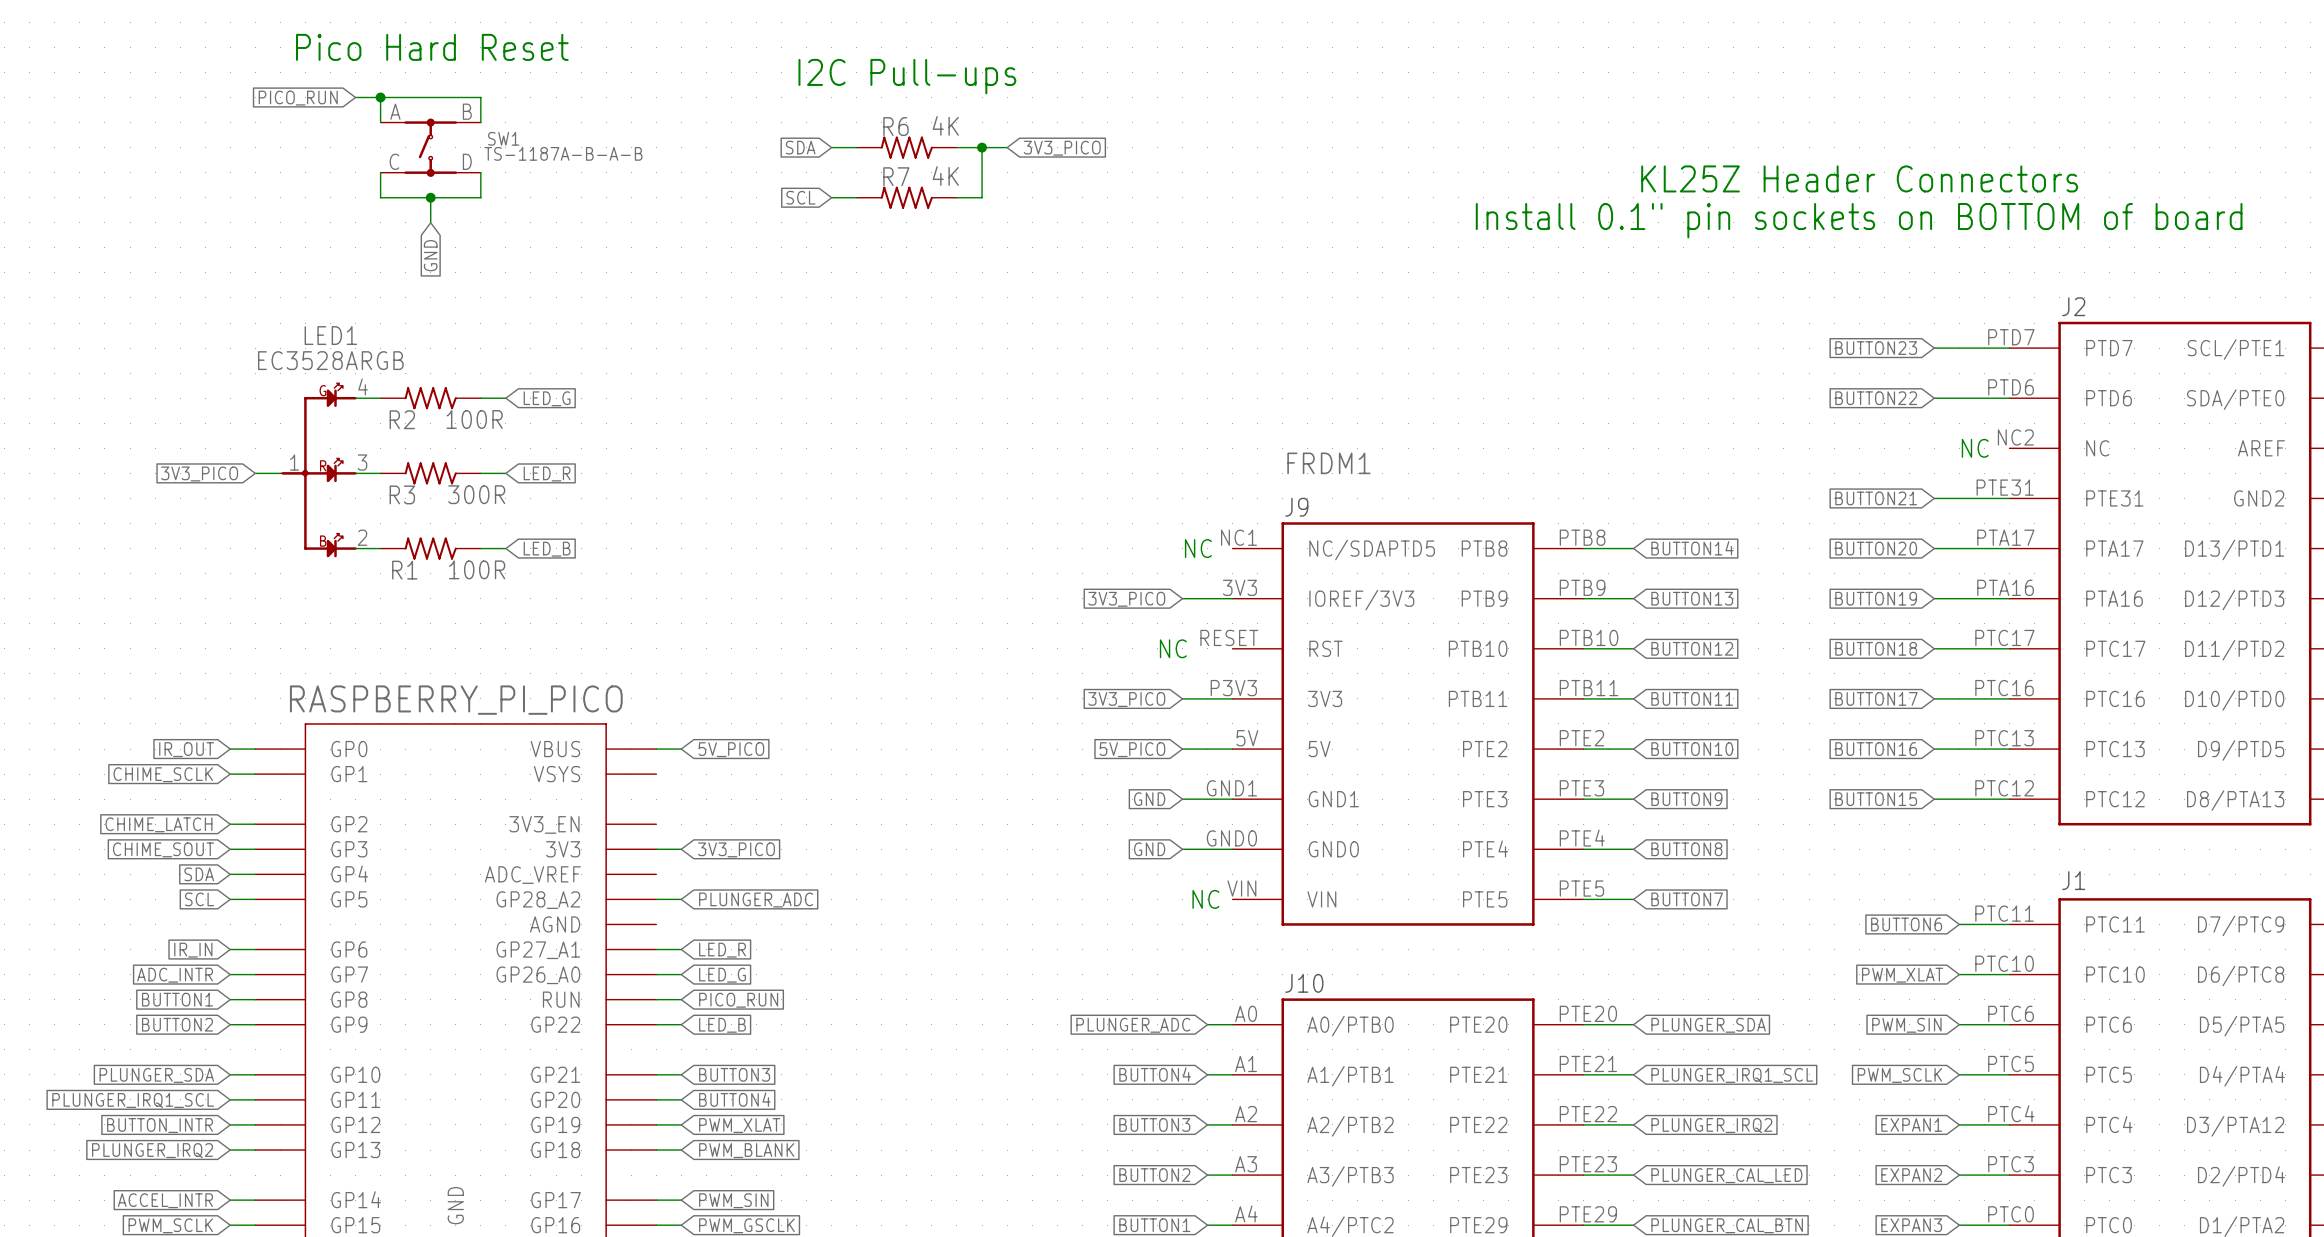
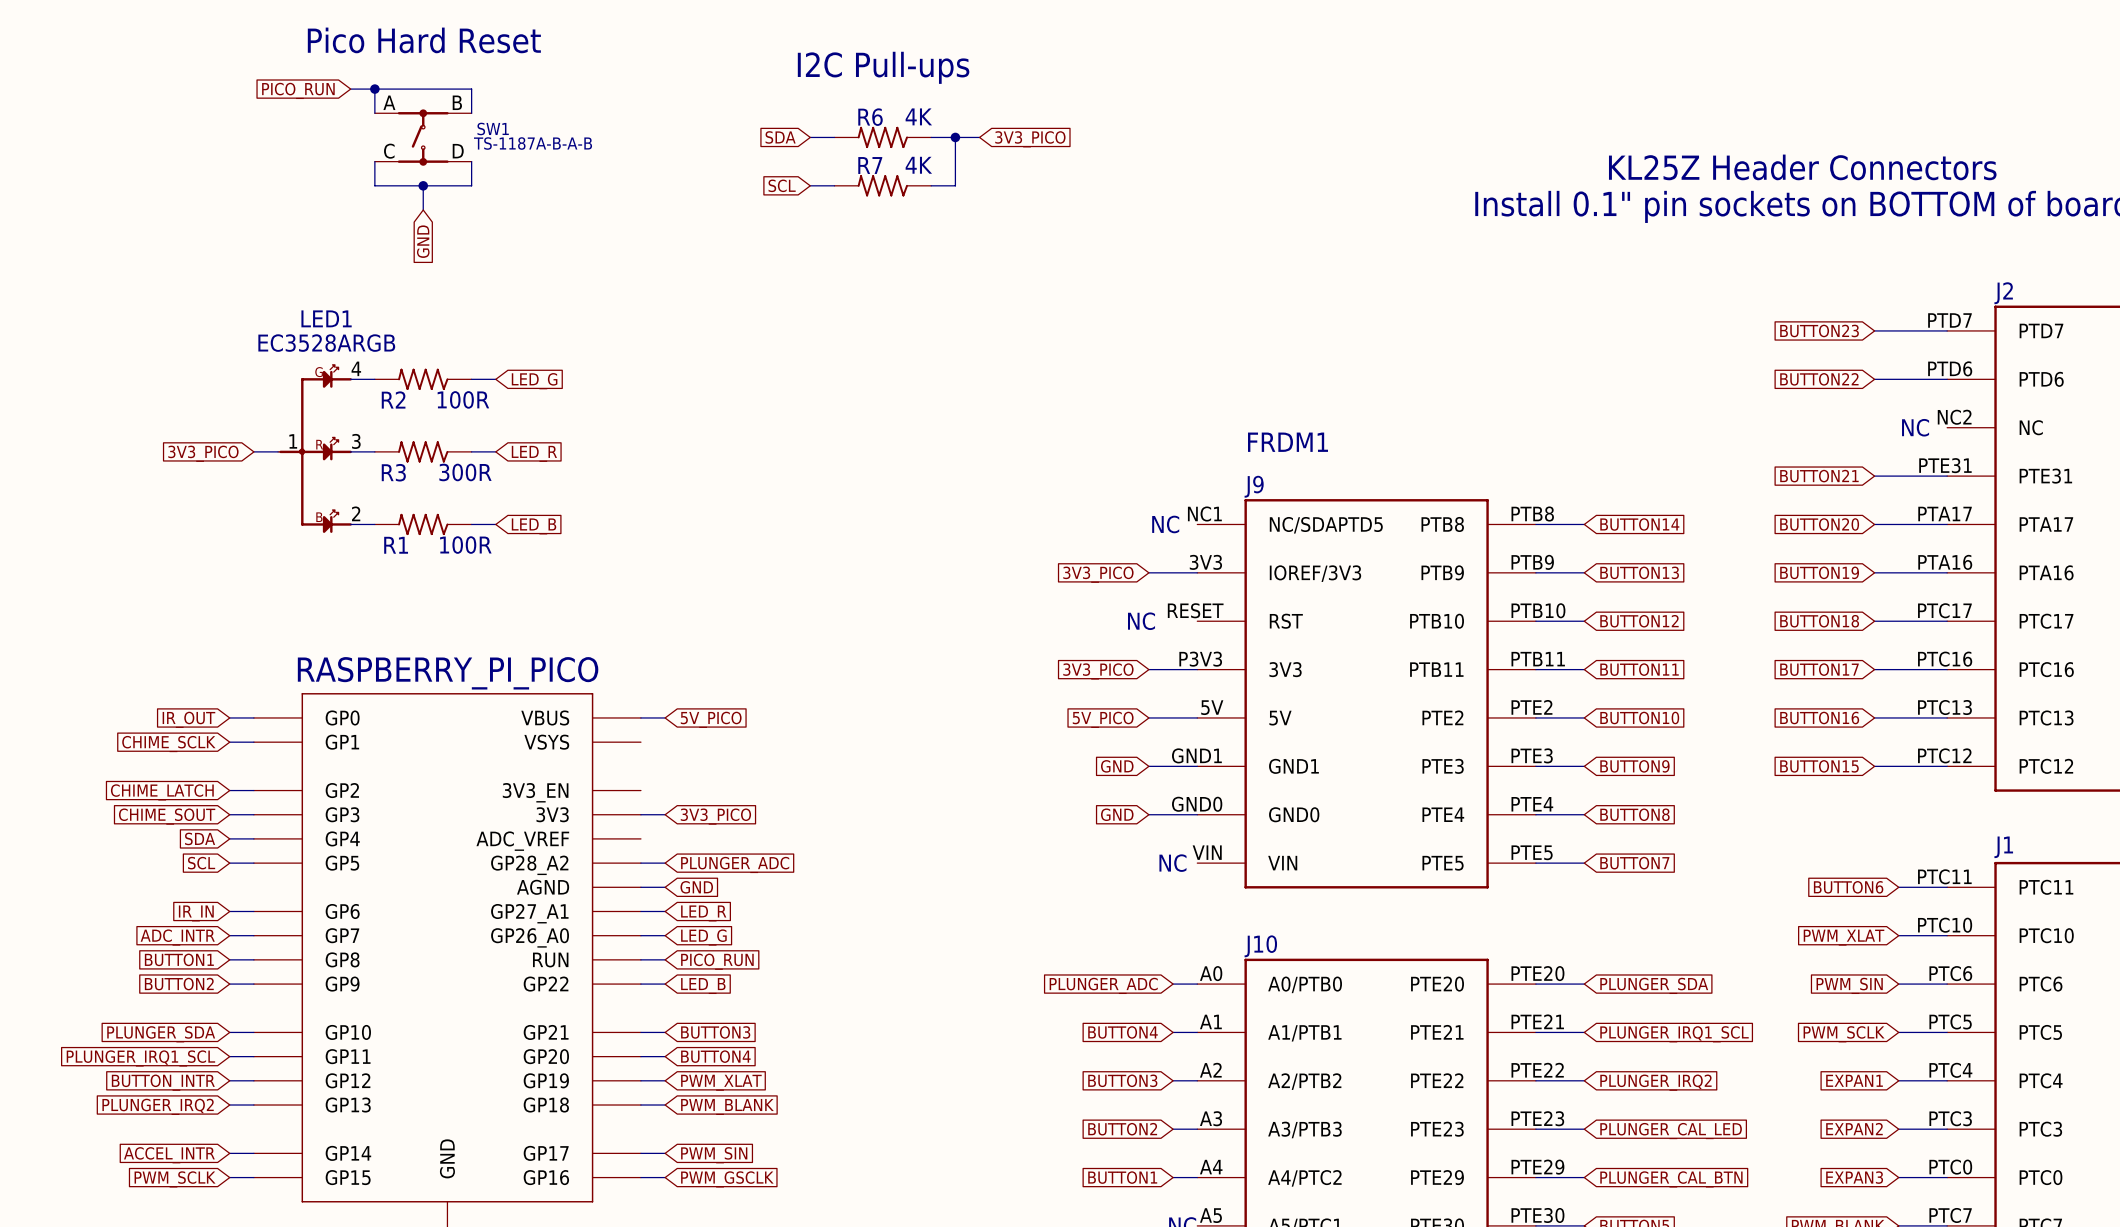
wire: none -> (640, 887) (665, 887)
global label: none -> GND (696, 887)

